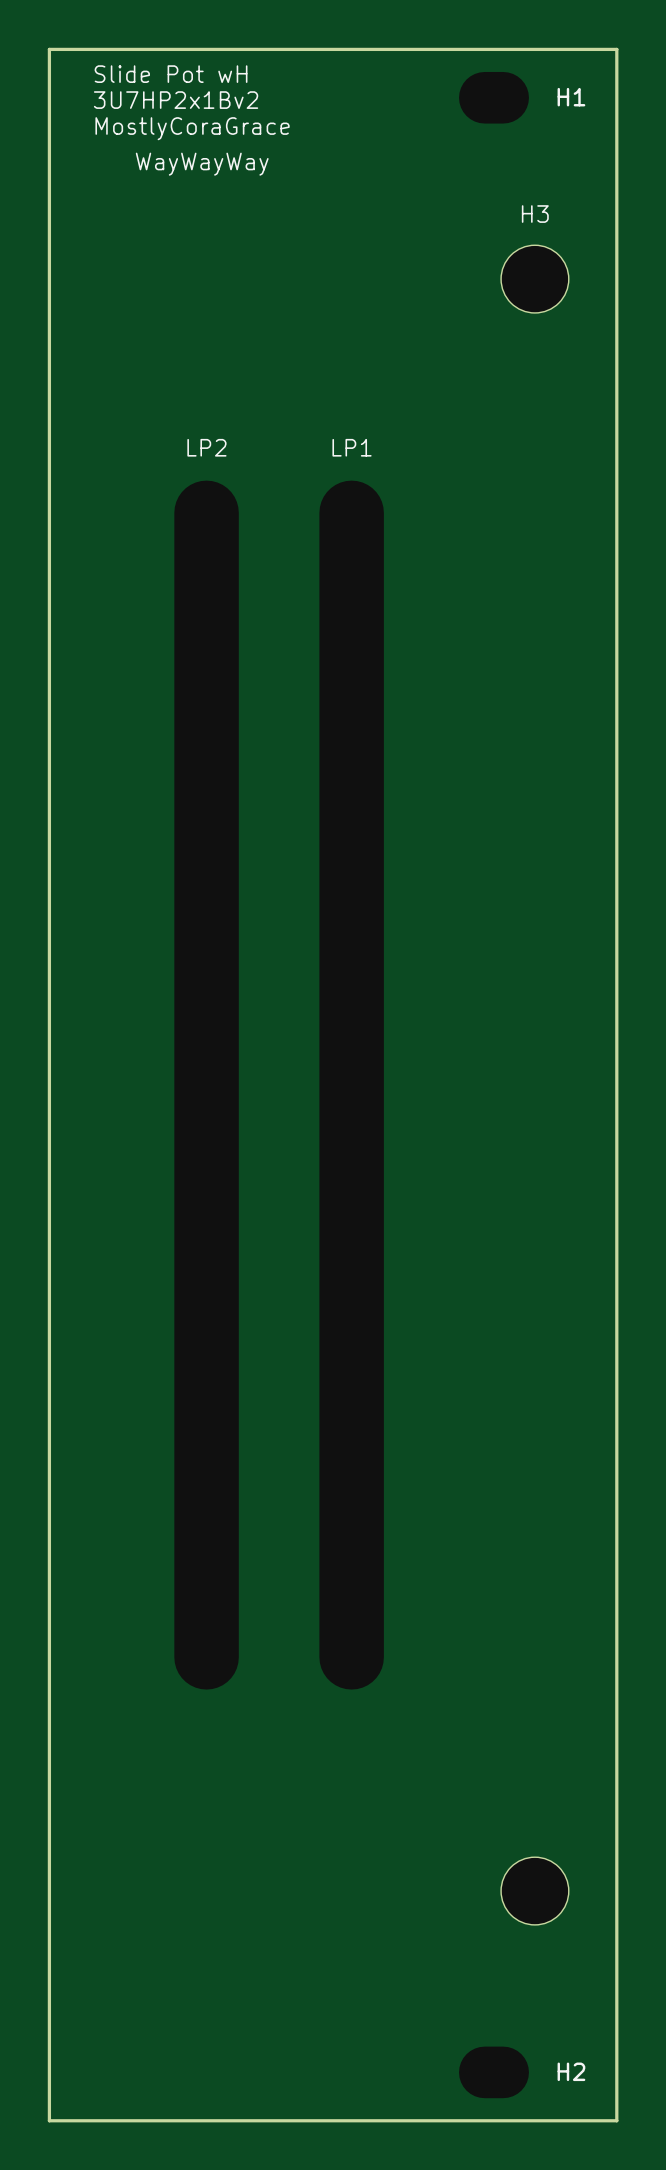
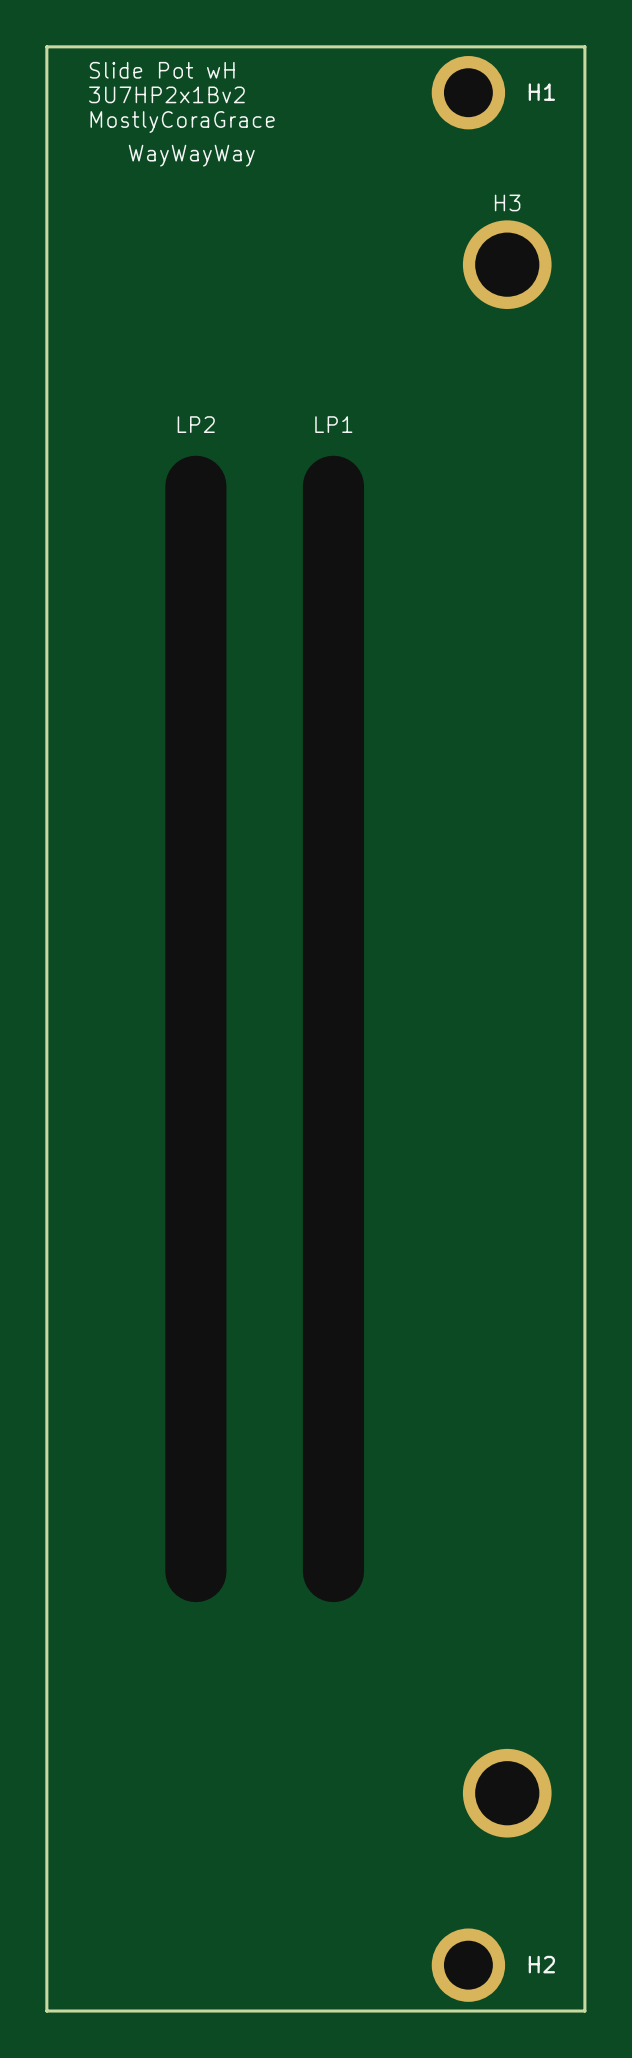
H1 footprint: [459, 71, 529, 124] -> [431, 56, 506, 130]
H3 footprint: [501, 245, 569, 1925] -> [462, 220, 552, 1838]
H2 footprint: [459, 2046, 529, 2099] -> [431, 1928, 506, 2002]

